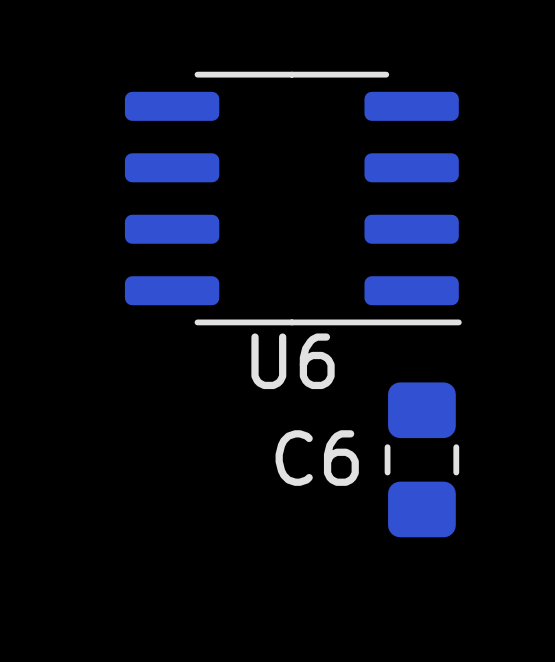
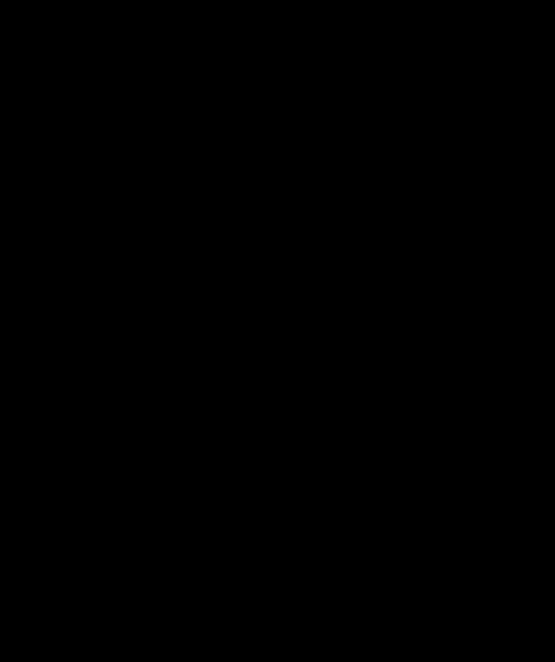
U6: (293, 198) -> none
C6: (421, 459) -> none

